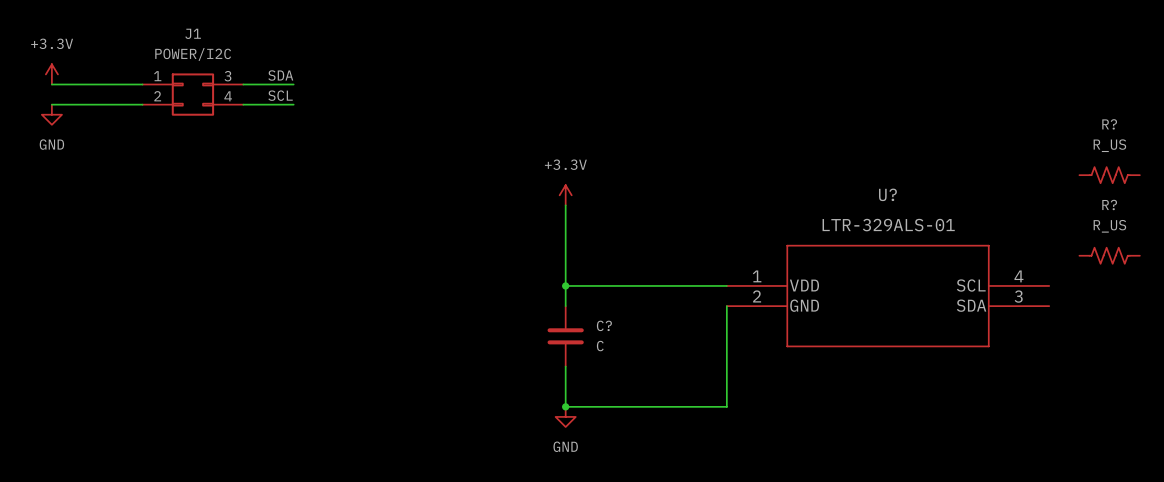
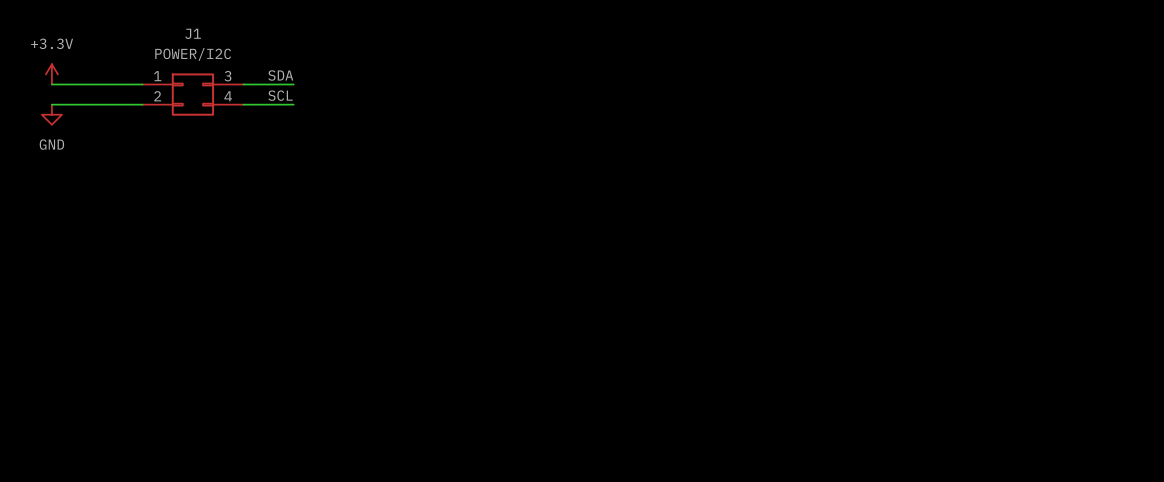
R?: R_US (1109, 175) -> none
power symbol: +3.3V (565, 195) -> none
wire: (565, 205) (565, 306) -> none
R?: R_US (1109, 255) -> none
wire: (565, 285) (726, 285) -> none
junction: (565, 285) -> none
U?: LTR-329ALS-01 (888, 296) -> none
wire: (726, 306) (726, 406) (565, 406) (565, 366) -> none
C?: C (565, 336) -> none
junction: (565, 406) -> none
power symbol: GND (565, 416) -> none

